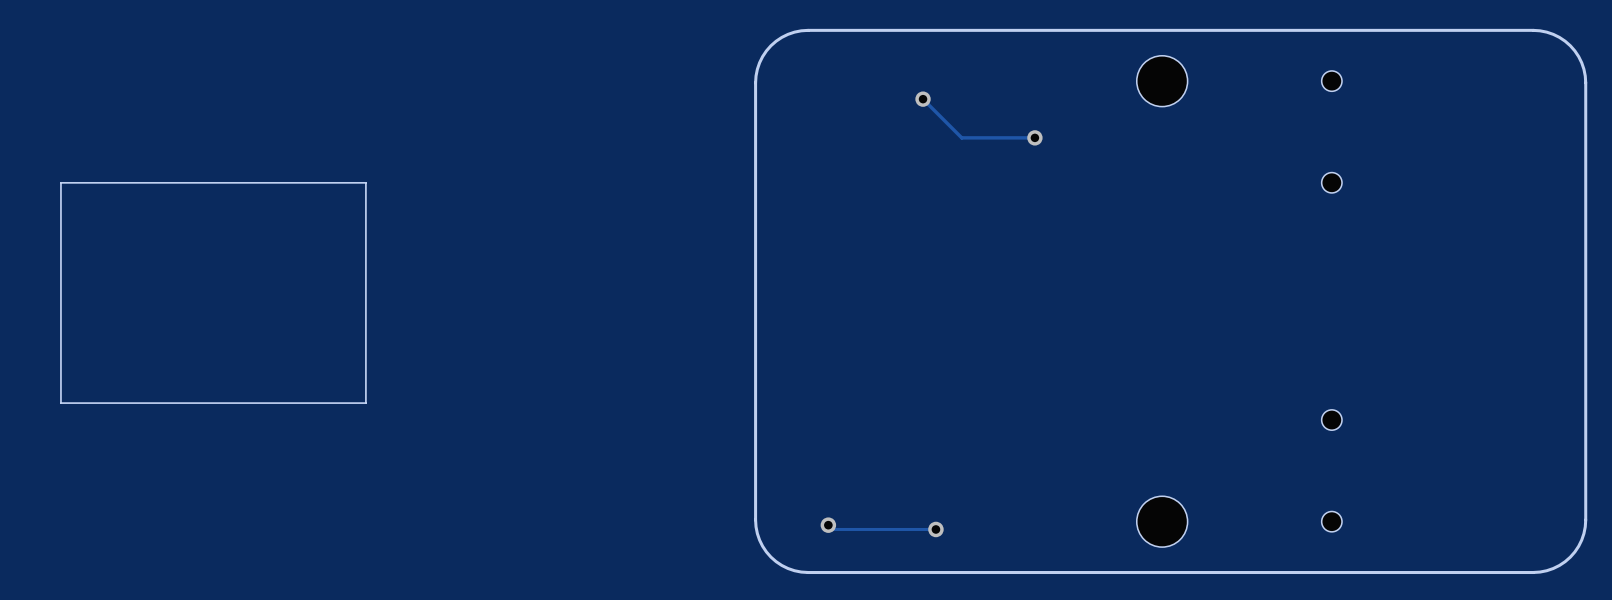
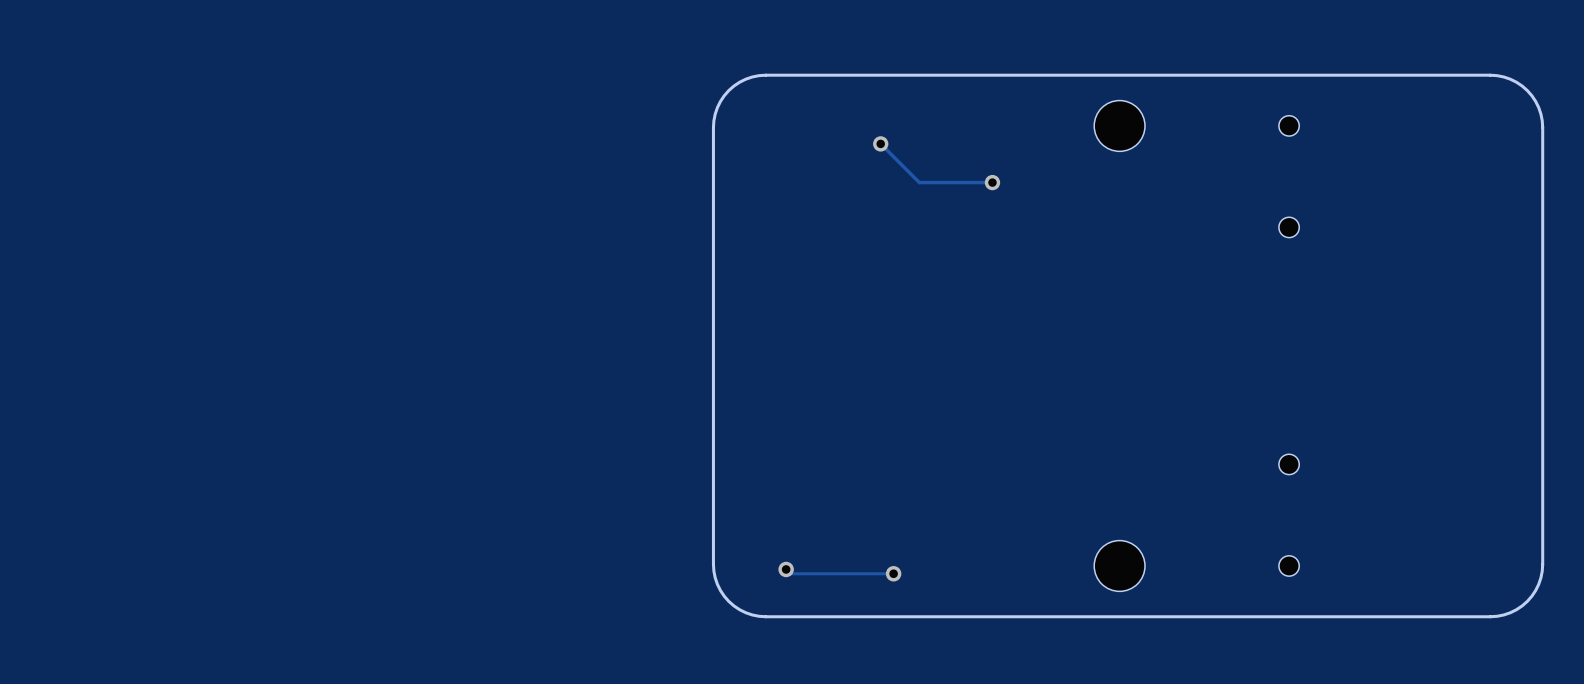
board edge: (365, 182) (365, 403) (60, 403) (60, 182) (365, 182) -> none

